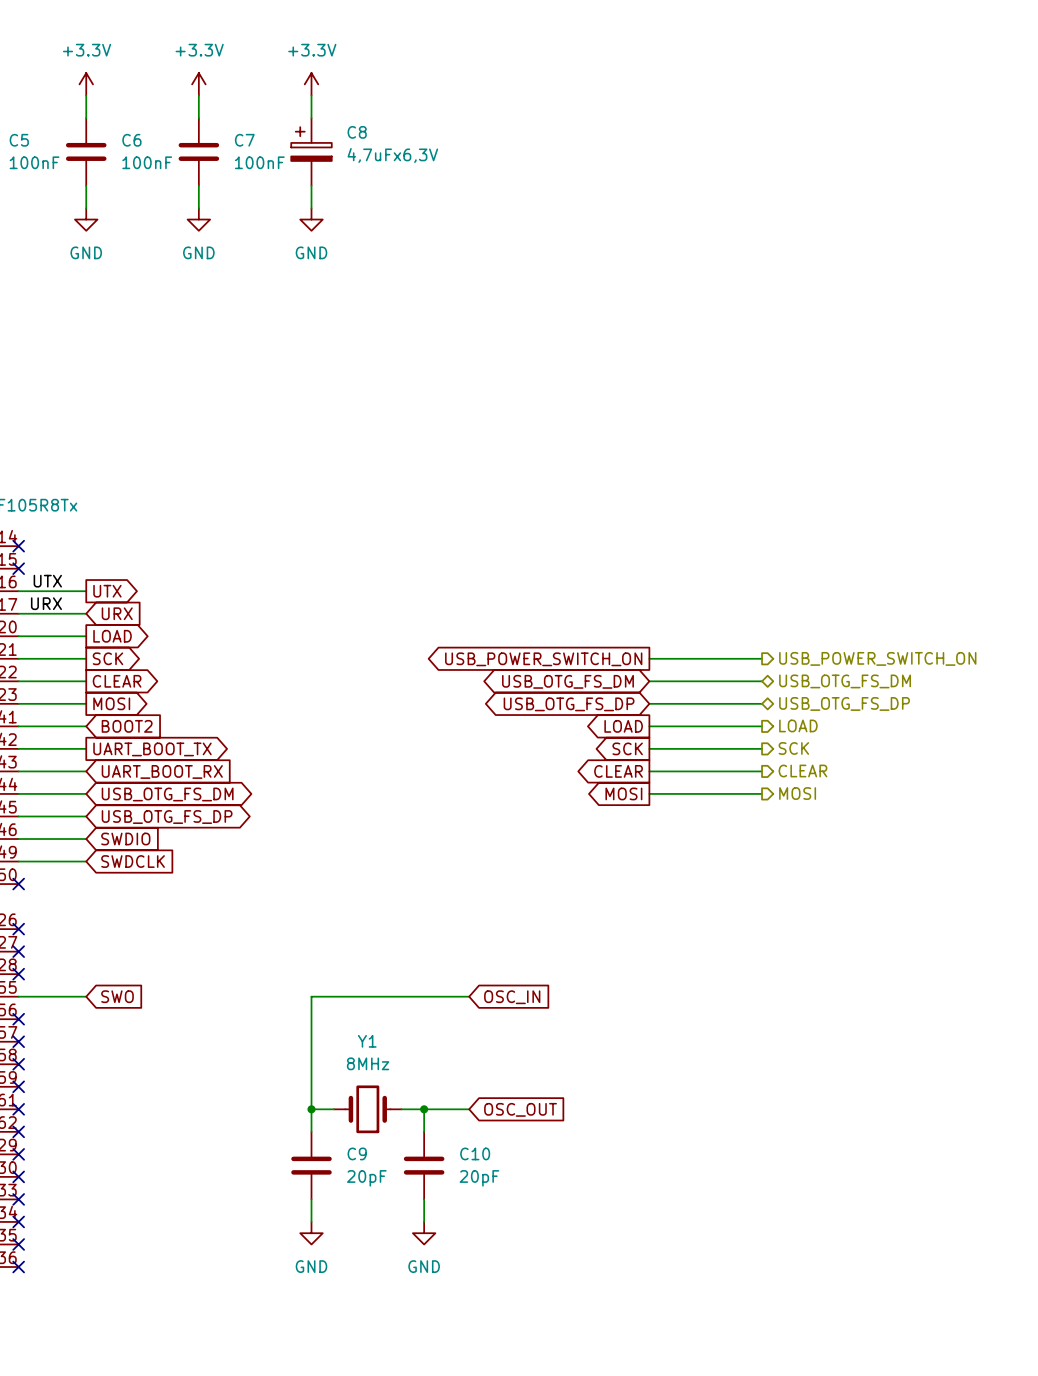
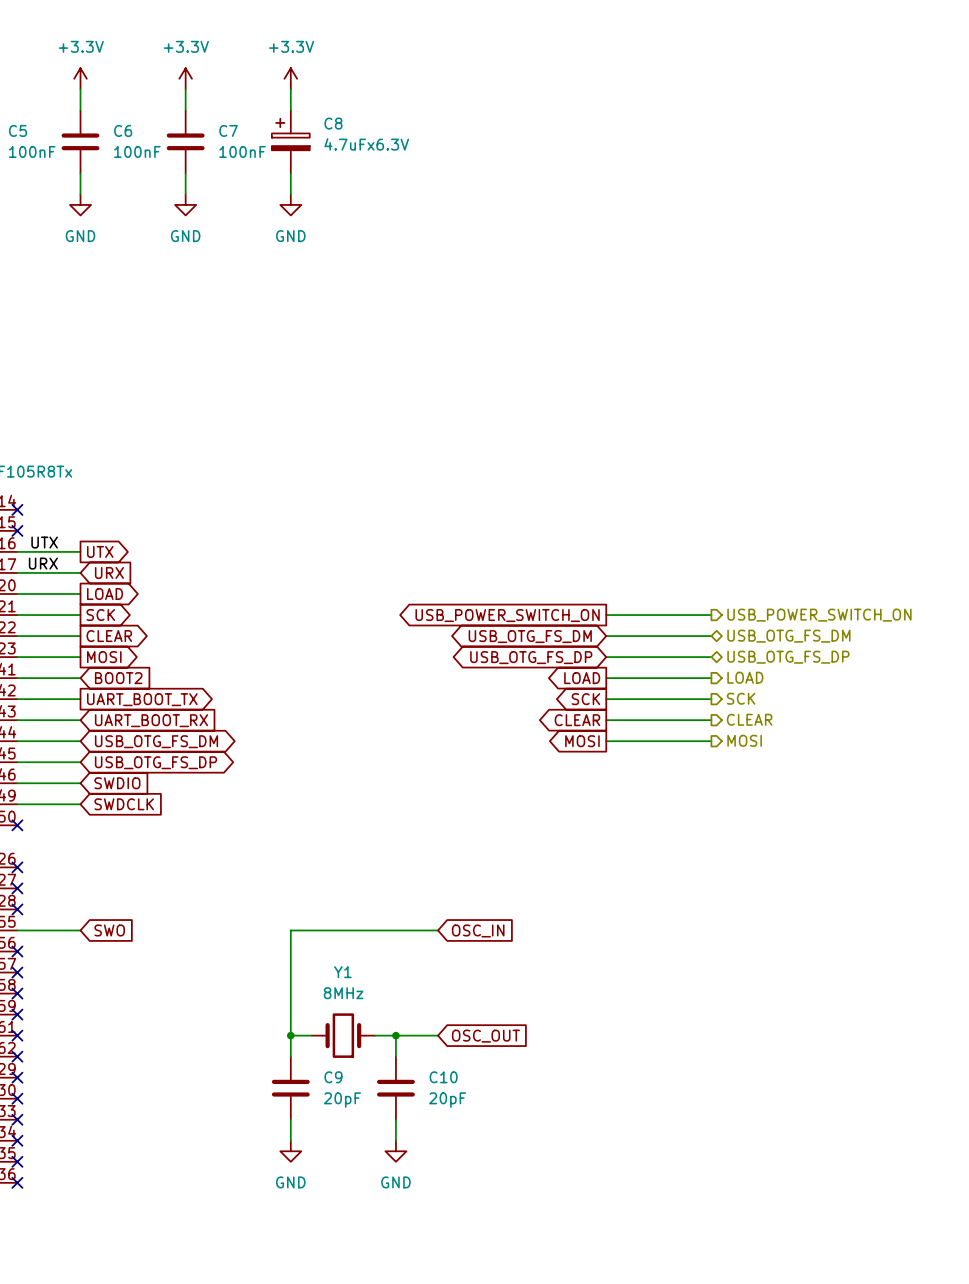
C8 value: 4,7uFx6,3V (392, 155) -> 4.7uFx6.3V (366, 144)

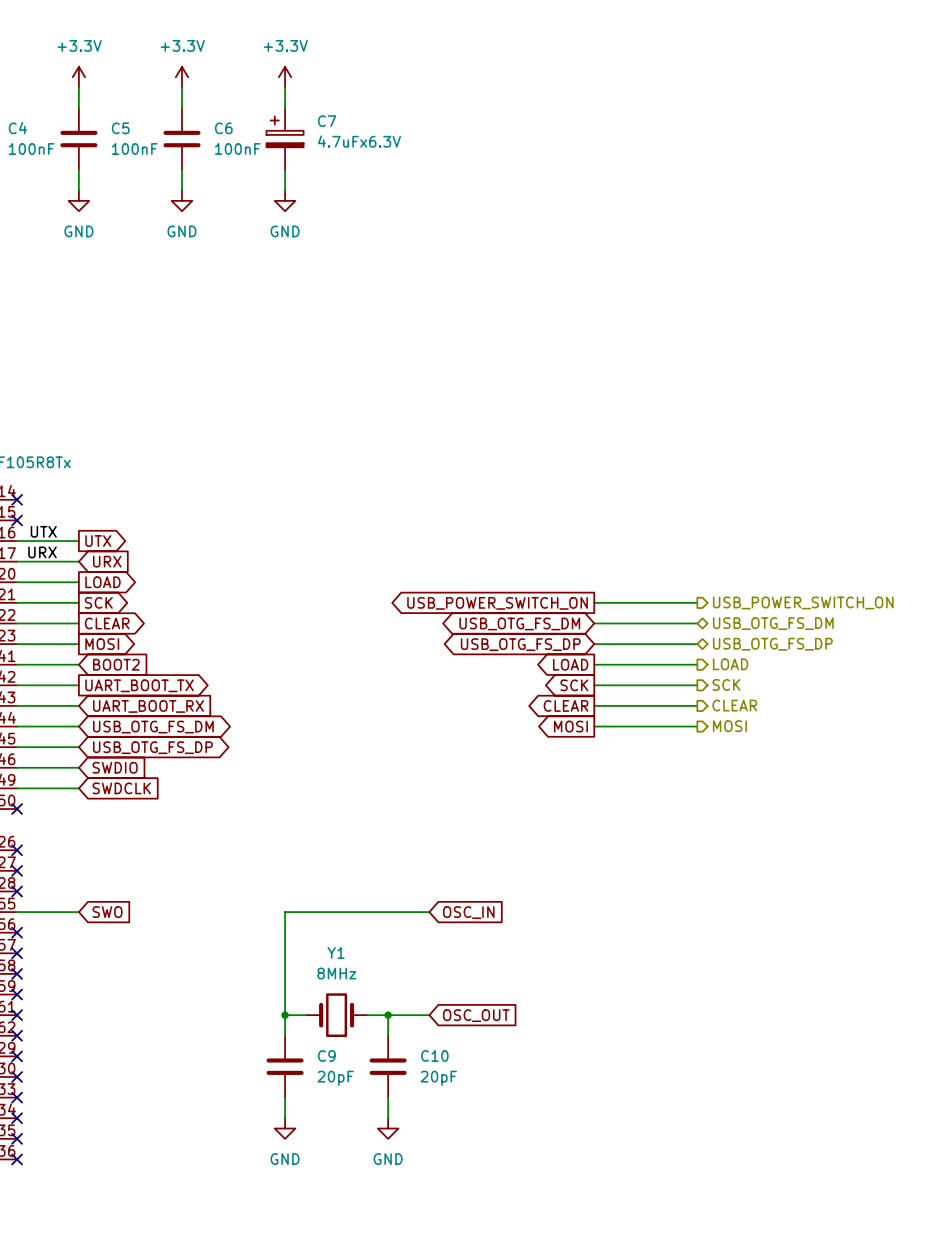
C8 name: C8 (333, 123) -> C7 (327, 121)
C5 name: C5 (17, 130) -> C4 (17, 128)
C6 name: C6 (123, 130) -> C5 (120, 128)
C7 name: C7 (228, 130) -> C6 (223, 128)

